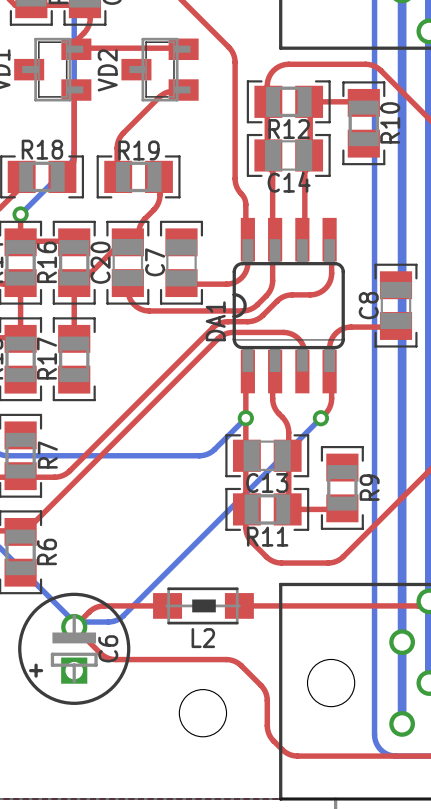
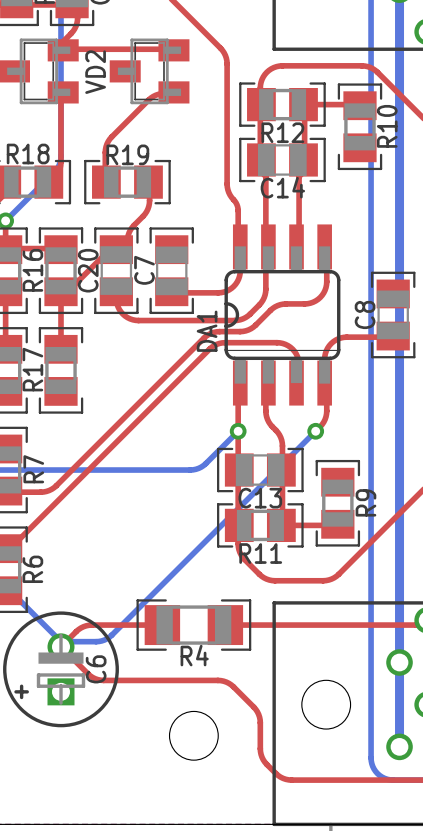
R4: none -> (193, 625)
L2: (203, 605) -> none

